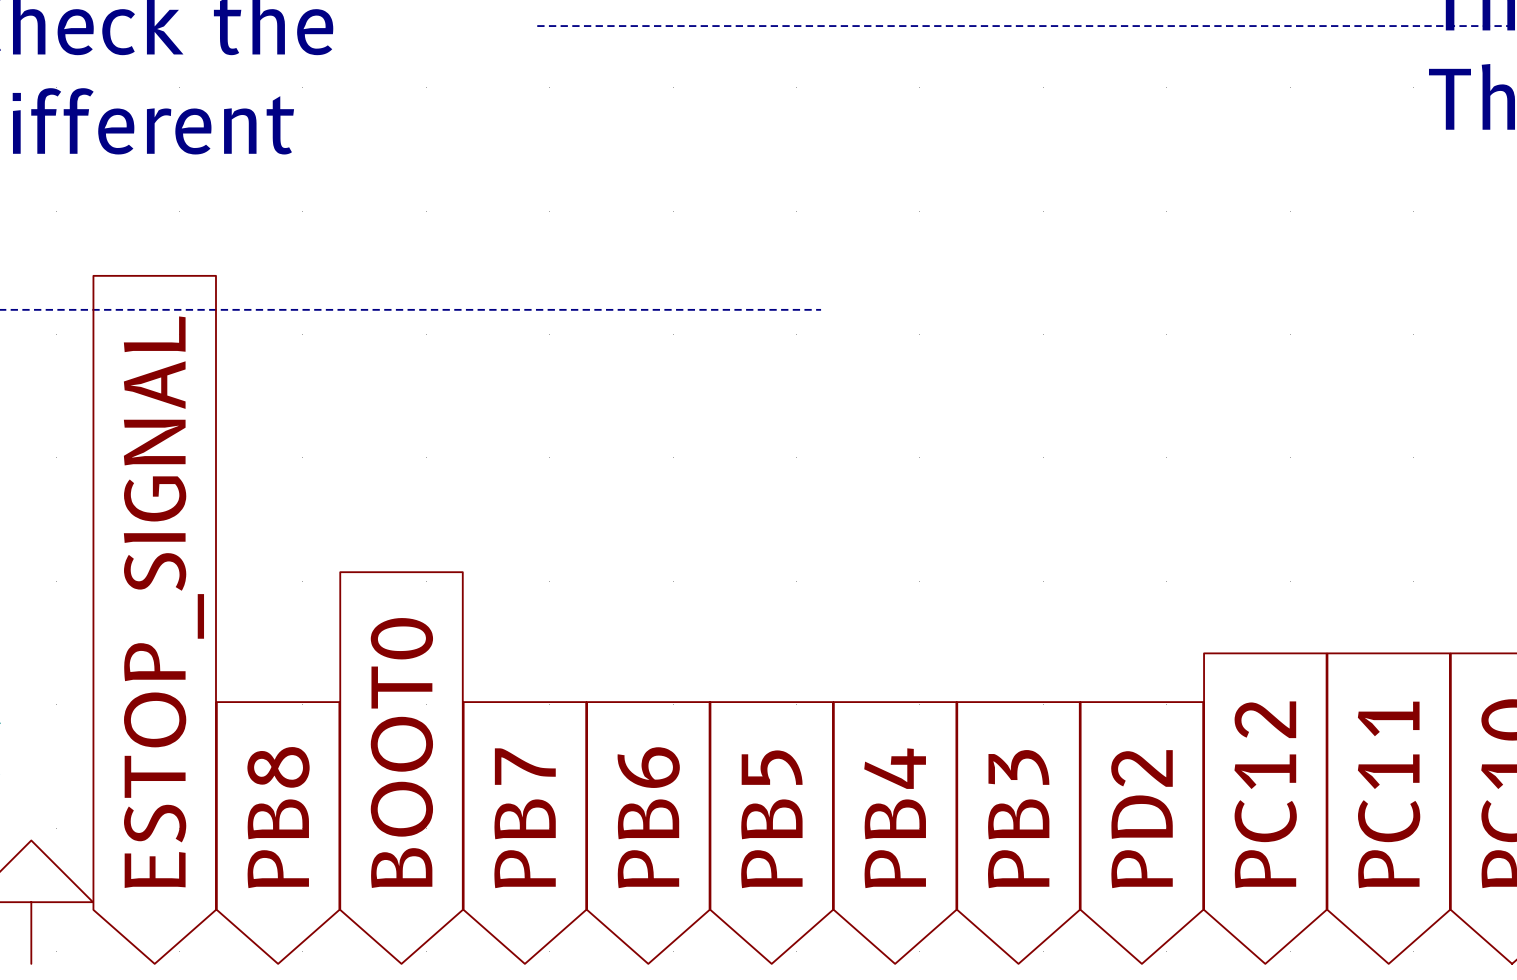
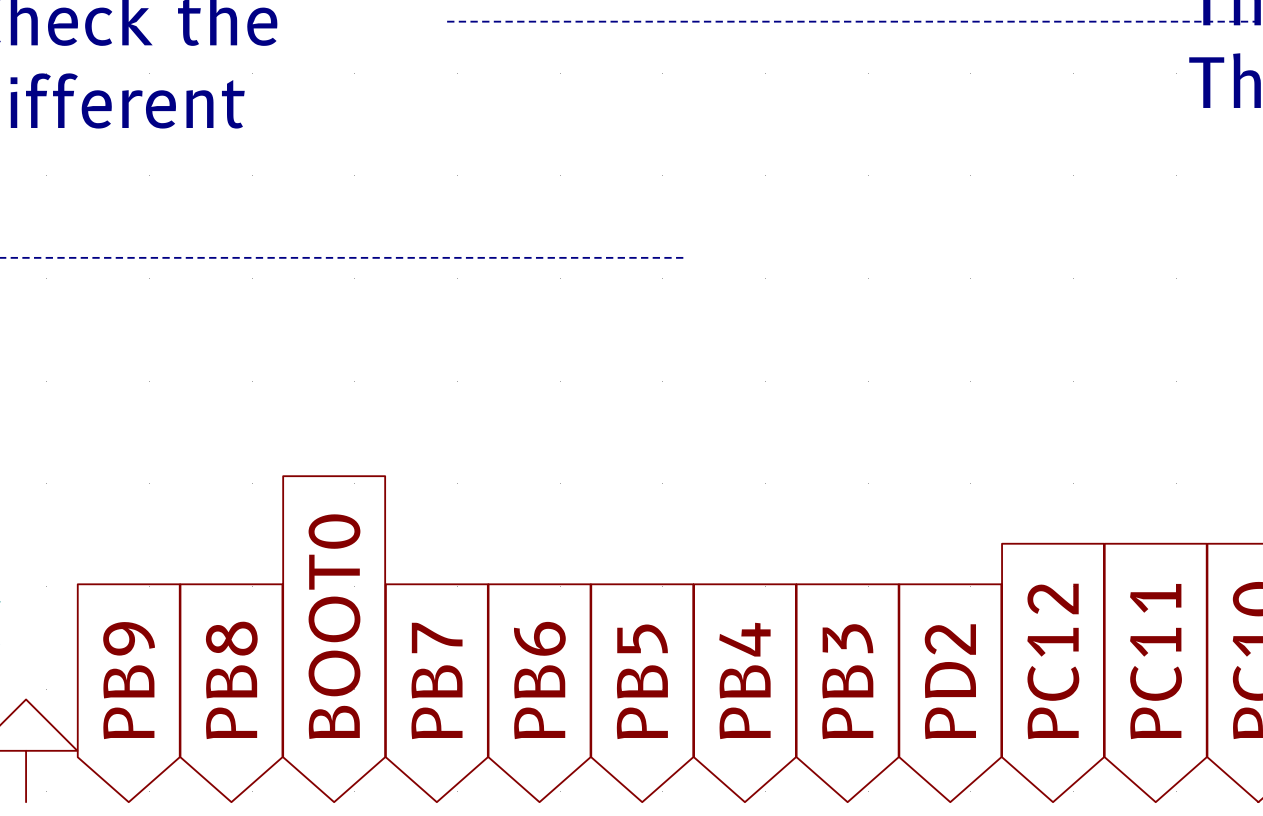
global label: ESTOP_SIGNAL (163, 602) -> PB9 (129, 680)

